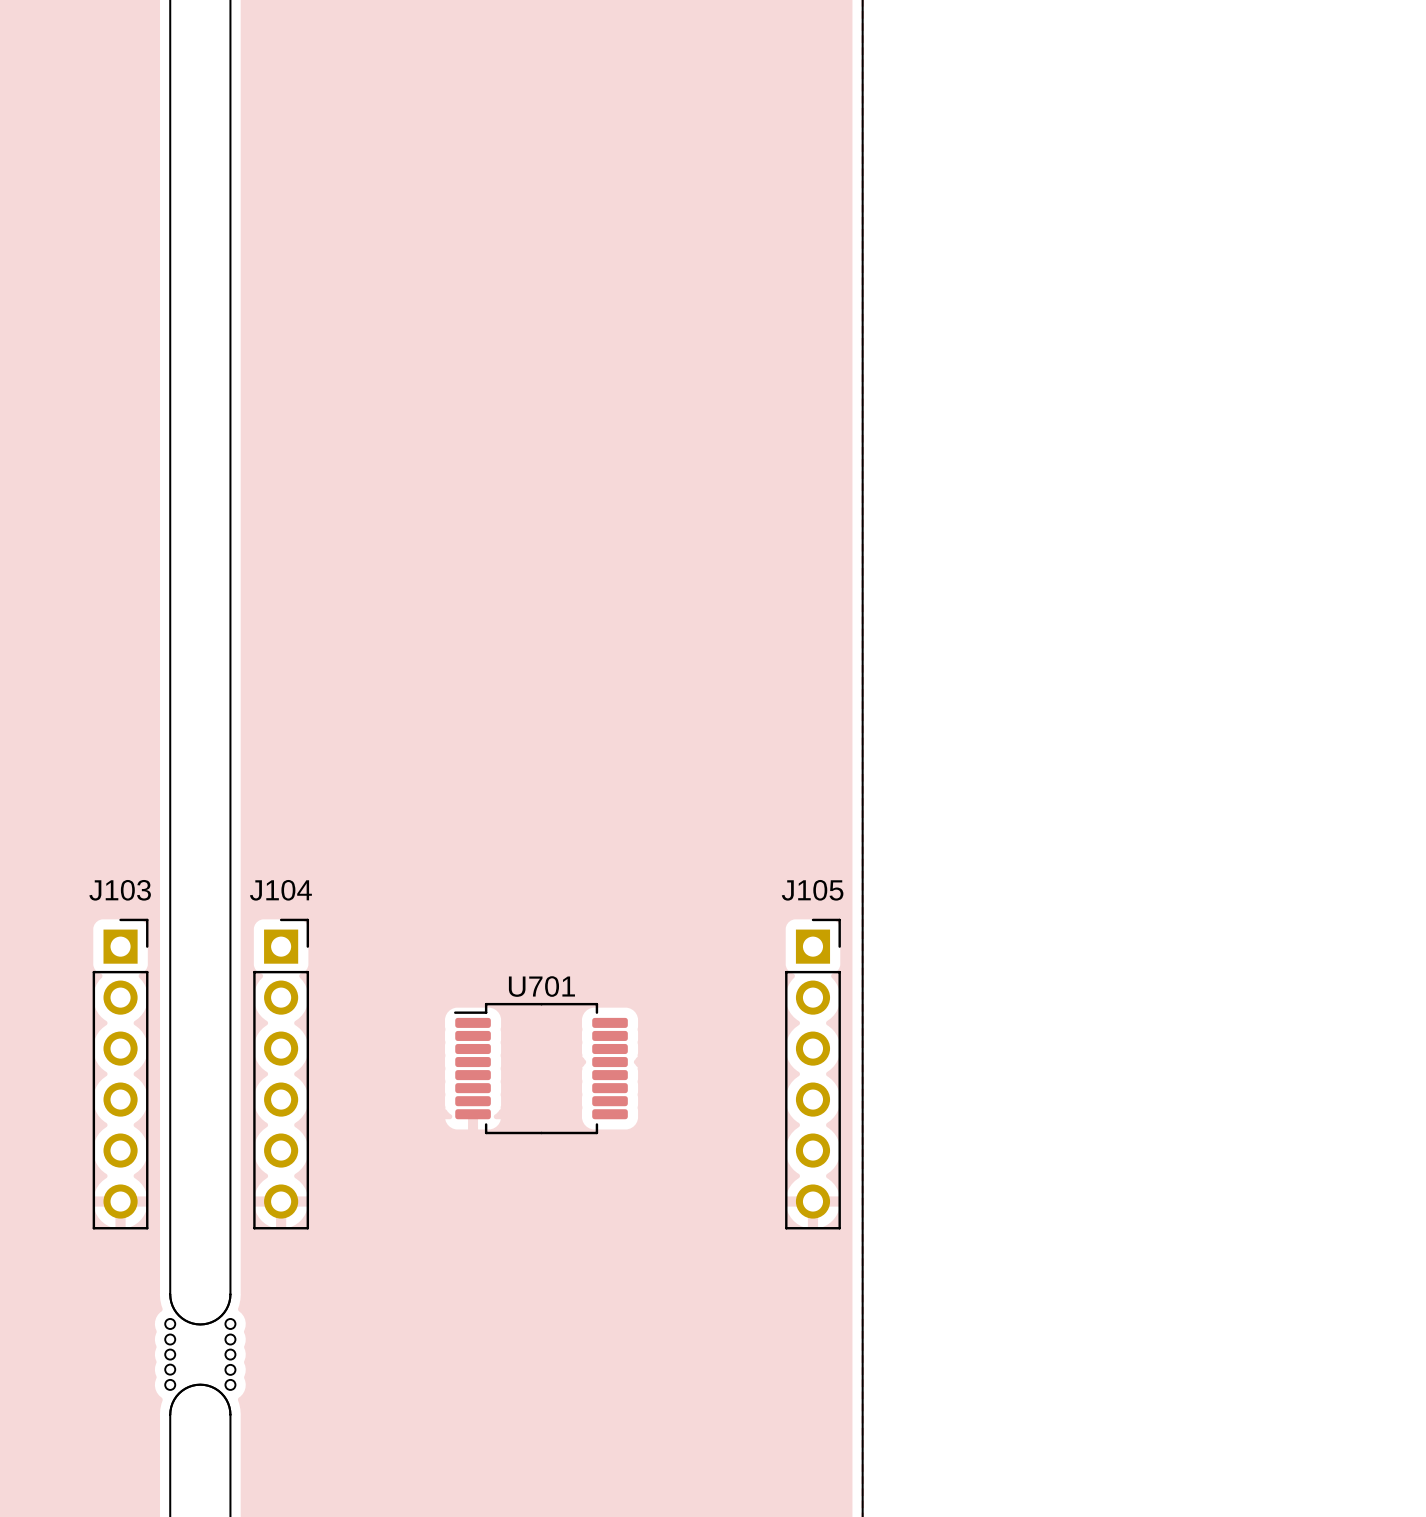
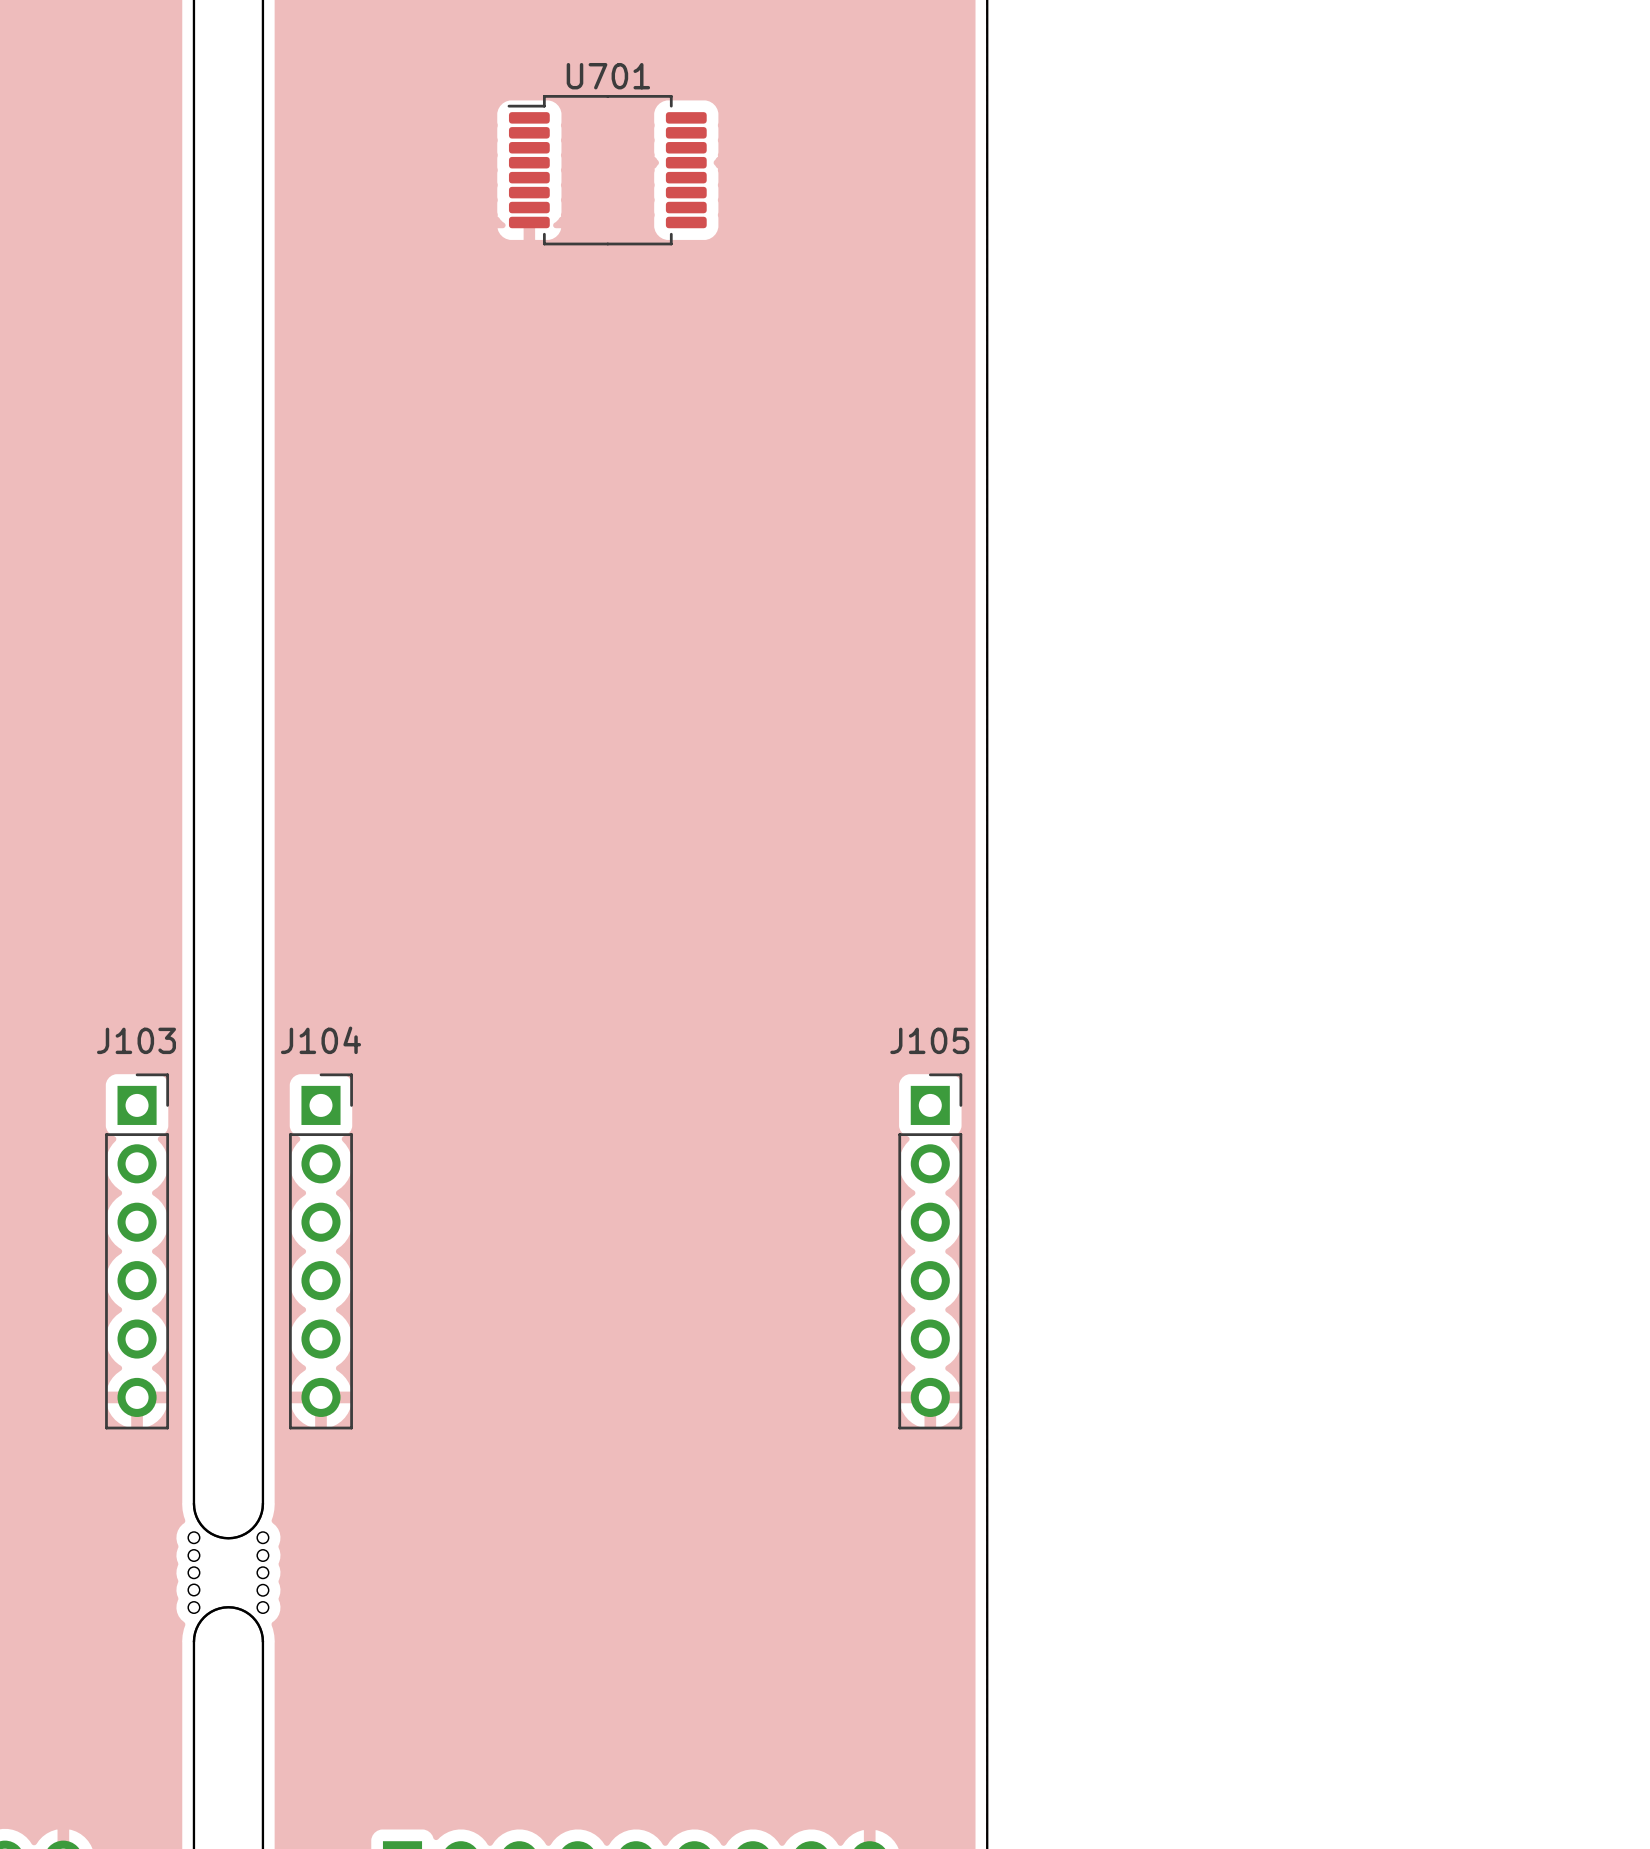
U701 position: (540, 1068) -> (607, 170)

